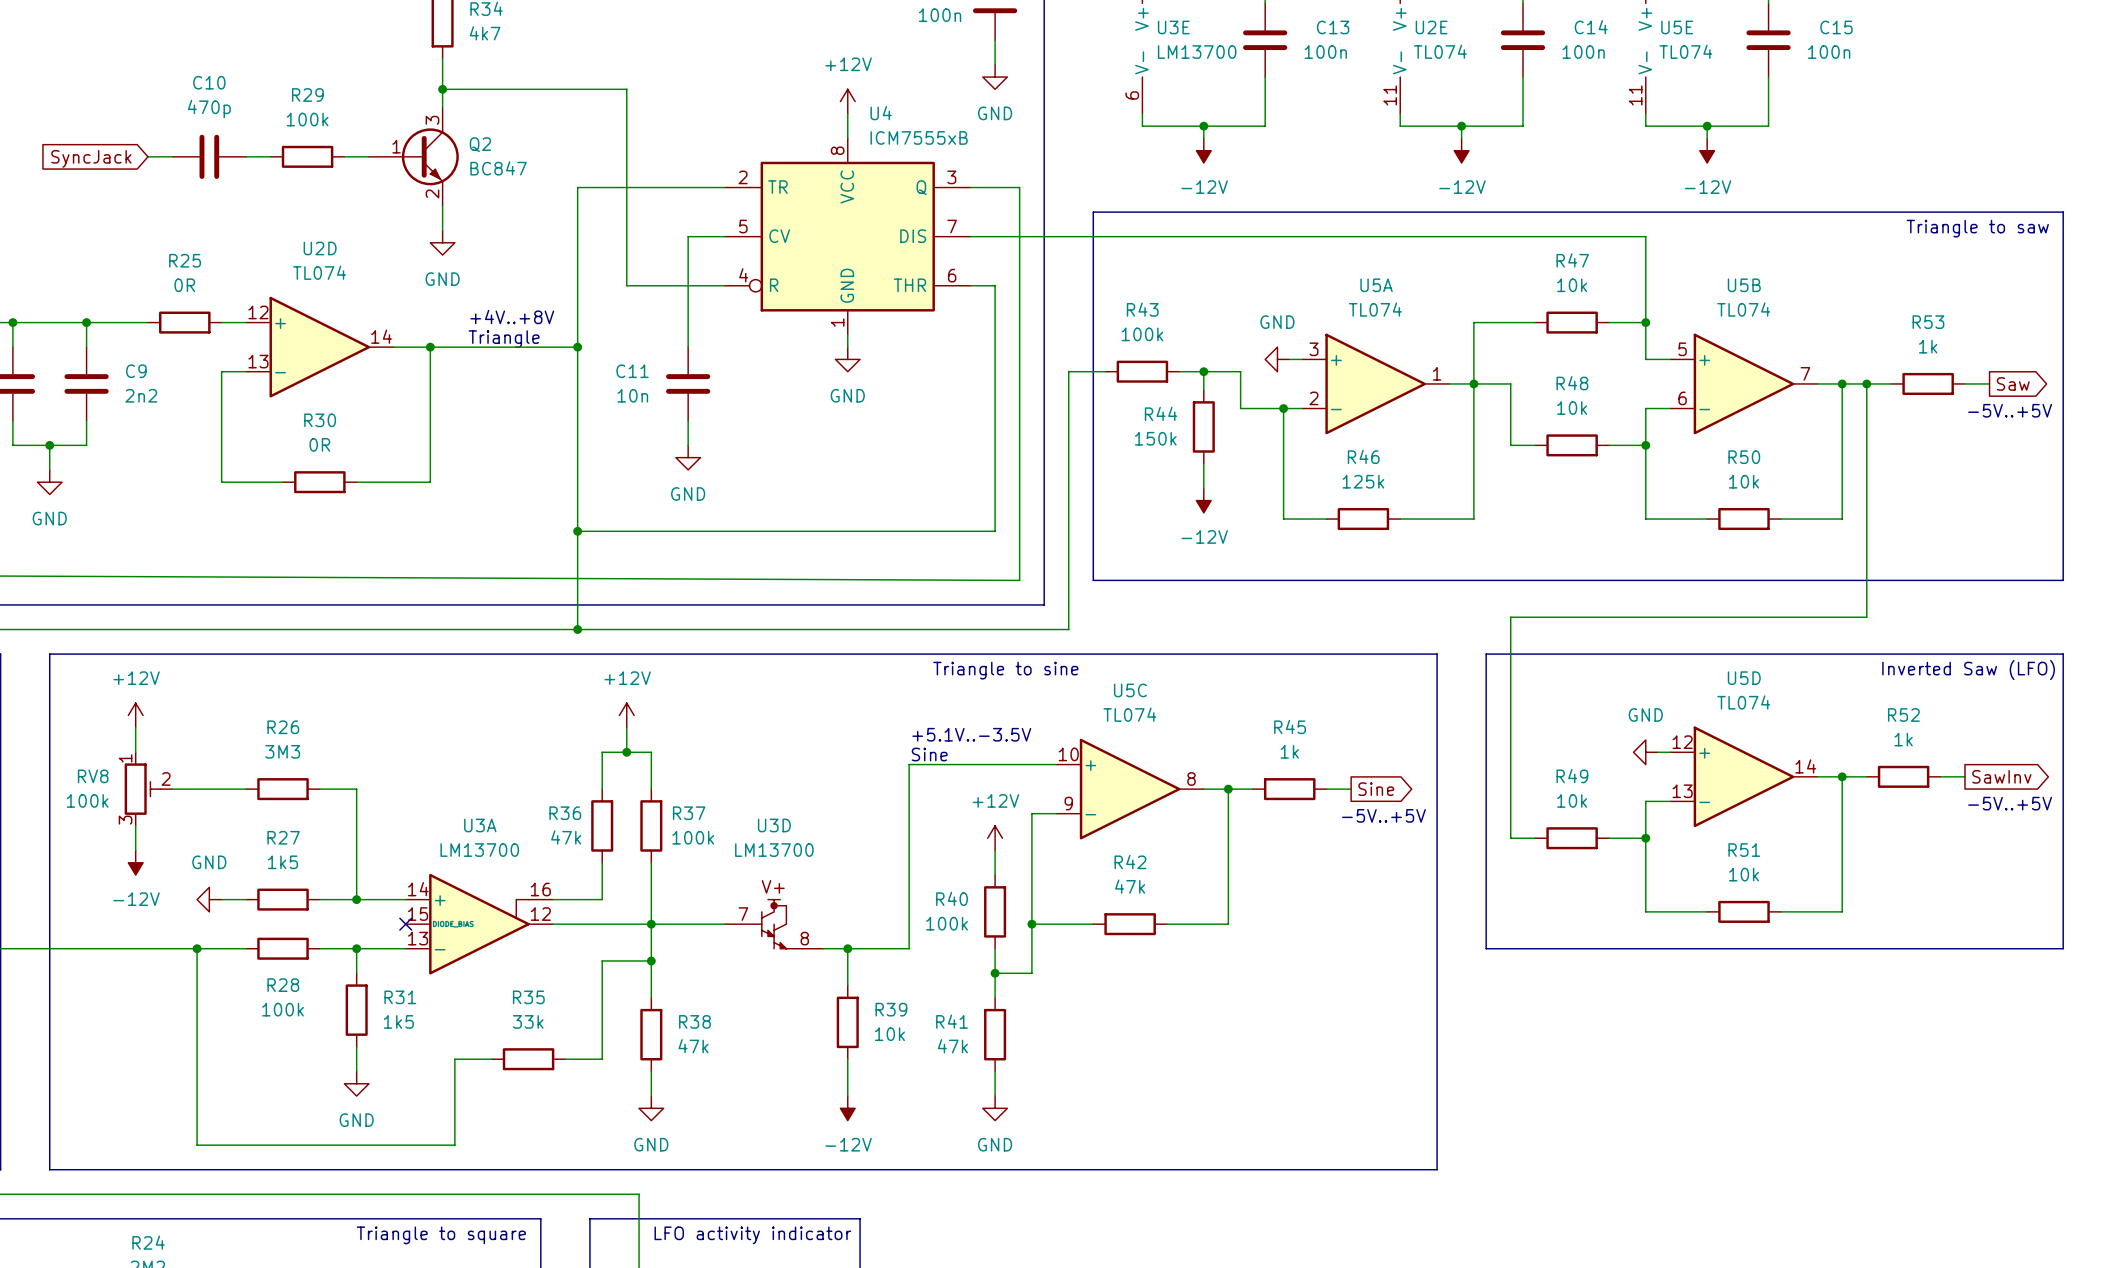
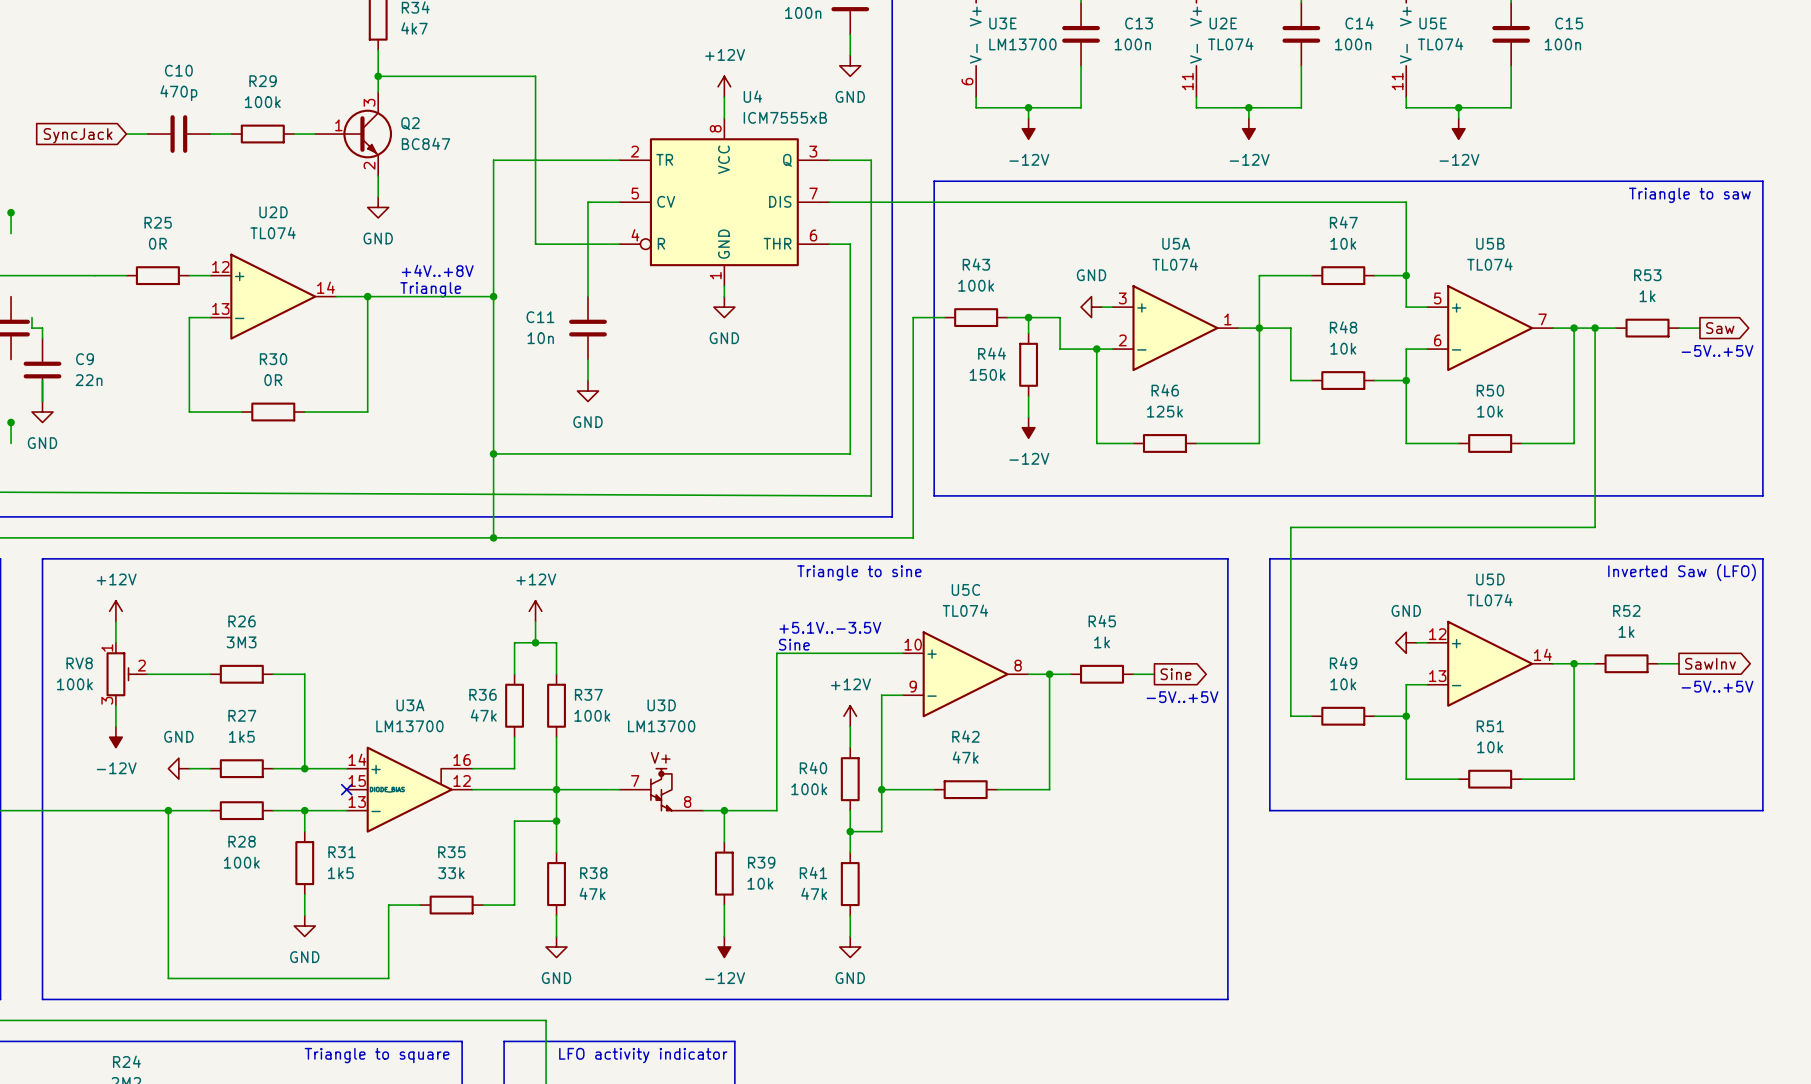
junction: none -> (11, 212)
wire: (12, 322) (12, 347) -> (11, 212) (11, 233)
junction: (12, 322) -> none
wire: (86, 322) (86, 347) -> (11, 422) (11, 443)
junction: (86, 322) -> none
wire: none -> (32, 317) (32, 328) (42, 328) (42, 338)
C9 position: (86, 383) -> (42, 370)
C9 value: 2n2 (141, 395) -> 22n (89, 380)
wire: (12, 420) (12, 445) (86, 445) (86, 420) -> none
junction: (49, 445) -> none
junction: none -> (11, 422)

